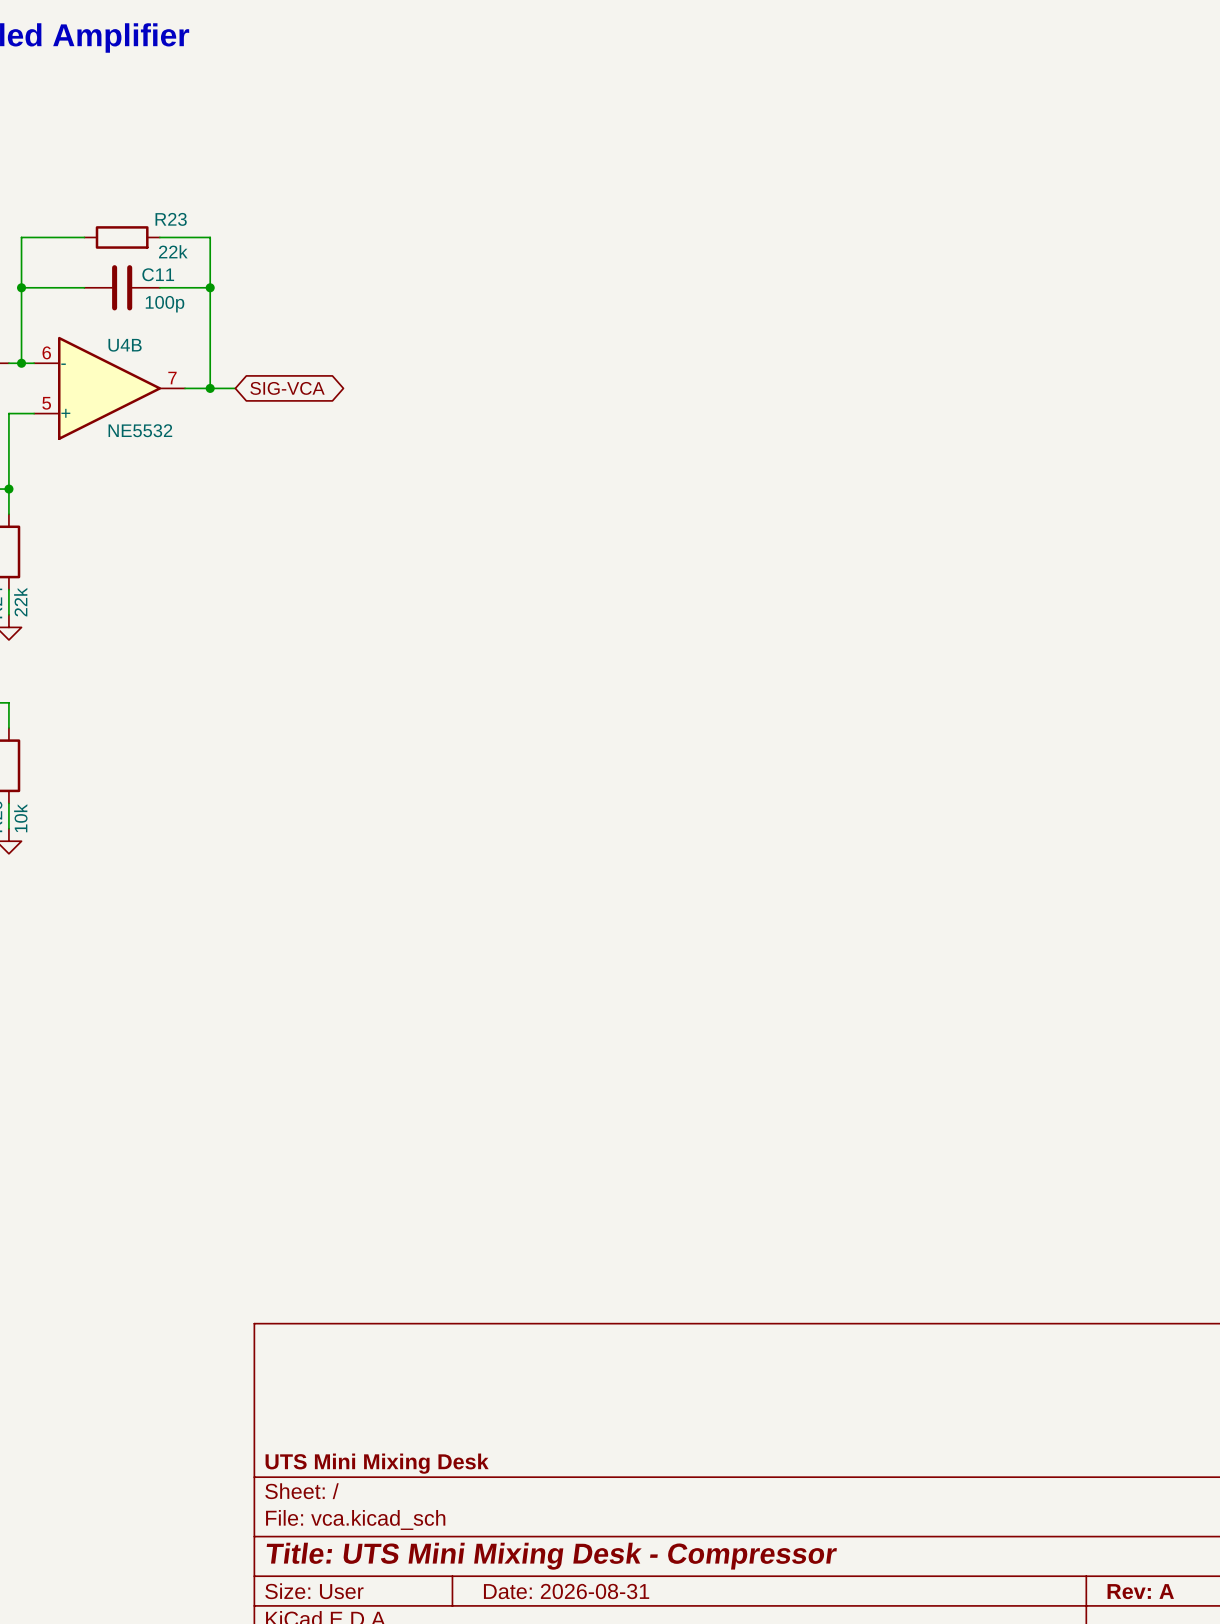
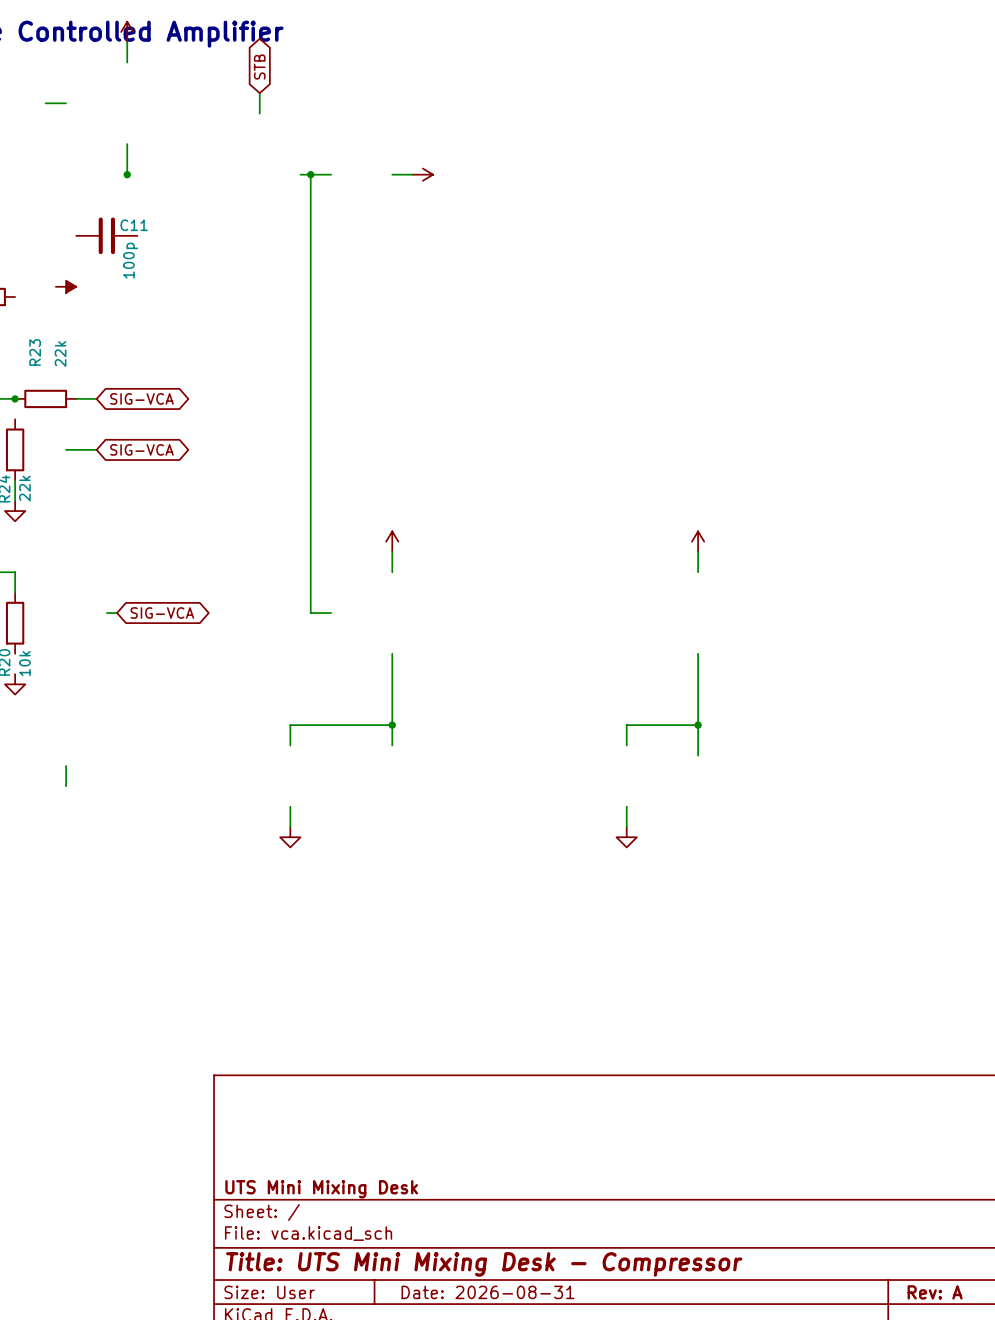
power symbol: none -> (127, 31)
wire: none -> (127, 42) (127, 62)
global label: none -> STB (259, 67)
wire: none -> (259, 93) (259, 113)
wire: none -> (45, 103) (66, 103)
wire: none -> (127, 144) (127, 174)
junction: none -> (127, 174)
wire: none -> (300, 174) (331, 174)
wire: none -> (310, 174) (310, 613) (331, 613)
junction: none -> (310, 174)
wire: none -> (392, 174) (412, 174)
power symbol: none -> (422, 174)
R23 name rotation: 0° (171, 219) -> 90° counterclockwise (35, 352)
R23 name position: R23 (171, 219) -> R23 (35, 352)
wire: (84, 237) (21, 237) (21, 363) -> none
R23 position: (122, 237) -> (45, 398)
wire: (159, 237) (210, 237) (210, 388) -> none
R23 value rotation: 0° (173, 251) -> 90° counterclockwise (60, 353)
R23 value position: 22k (173, 251) -> 22k (60, 353)
wire: (21, 287) (84, 287) -> none
junction: (21, 287) -> none
wire: (159, 287) (210, 287) -> none
junction: (210, 287) -> none
C11 value rotation: 0° (165, 304) -> 90° counterclockwise (130, 260)
power symbol: none -> (66, 286)
wire: (8, 363) (34, 363) -> (76, 398) (96, 398)
junction: (21, 363) -> none
U4B: NE5532 (109, 388) -> none
wire: (185, 388) (235, 388) -> none
junction: (210, 388) -> none
global label: SIG-VCA (287, 388) -> none
wire: (34, 413) (8, 413) (8, 514) -> none
global label: none -> SIG-VCA (141, 398)
wire: none -> (66, 449) (96, 449)
global label: none -> SIG-VCA (141, 449)
power symbol: none -> (392, 541)
power symbol: none -> (698, 541)
wire: none -> (392, 551) (392, 572)
wire: none -> (698, 551) (698, 572)
wire: none -> (106, 613) (117, 613)
global label: none -> SIG-VCA (162, 613)
wire: (8, 803) (8, 828) -> (66, 765) (66, 786)
wire: none -> (392, 653) (392, 745)
wire: none -> (698, 653) (698, 755)
wire: none -> (392, 725) (290, 725) (290, 745)
junction: none -> (392, 725)
wire: none -> (698, 725) (626, 725) (626, 745)
junction: none -> (698, 725)
wire: none -> (290, 806) (290, 827)
wire: none -> (626, 806) (626, 827)
power symbol: none -> (290, 837)
power symbol: none -> (626, 837)

